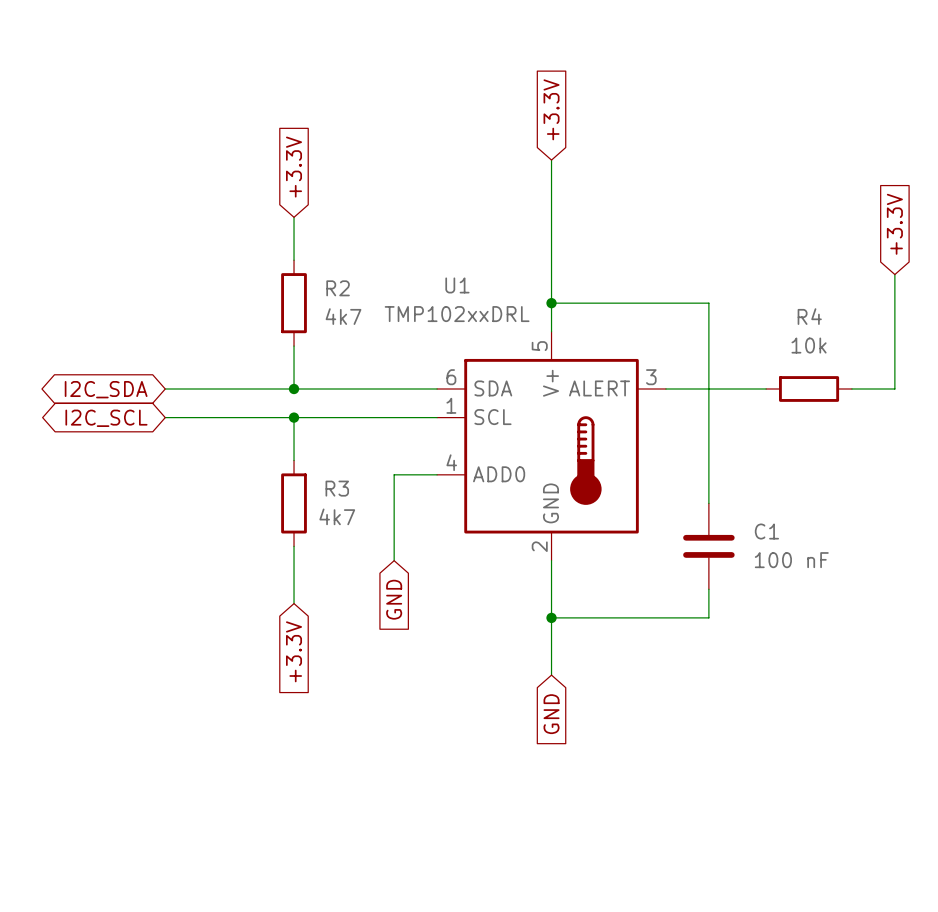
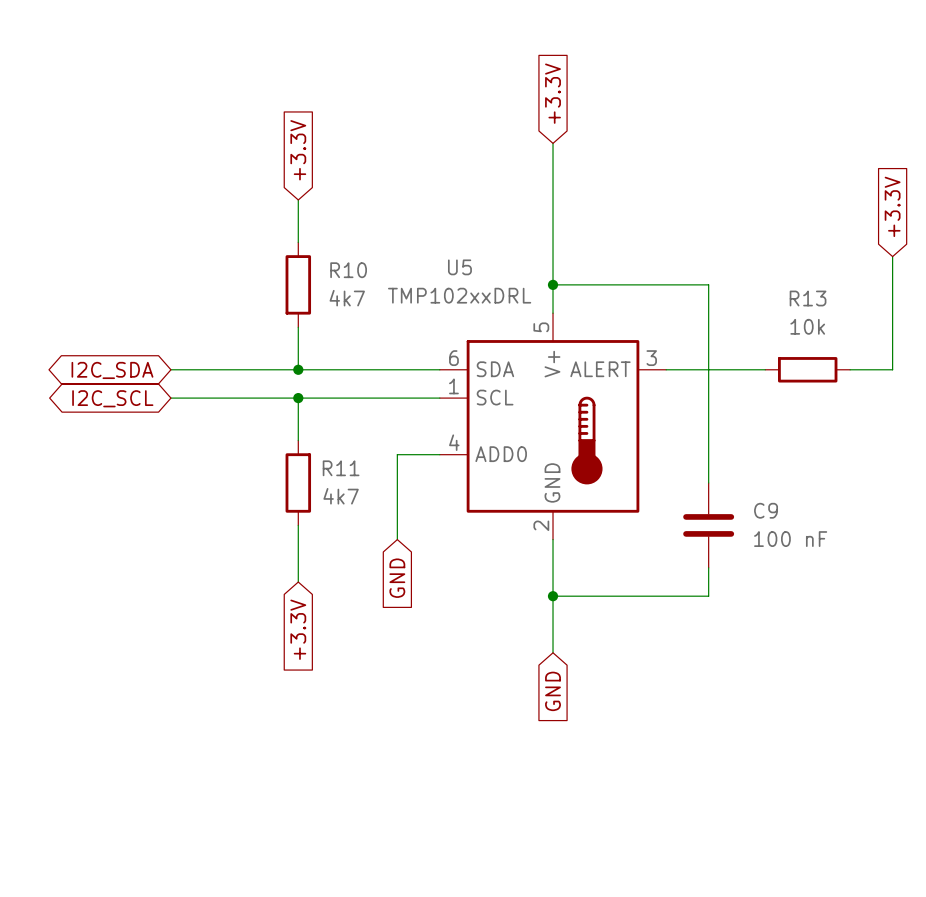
U1 name: U1 (457, 285) -> U5 (459, 267)
R2 name: R2 (338, 288) -> R10 (348, 270)
R4 name: R4 (809, 316) -> R13 (808, 298)
R3 name: R3 (337, 488) -> R11 (341, 468)
C1 name: C1 (766, 531) -> C9 (766, 510)

